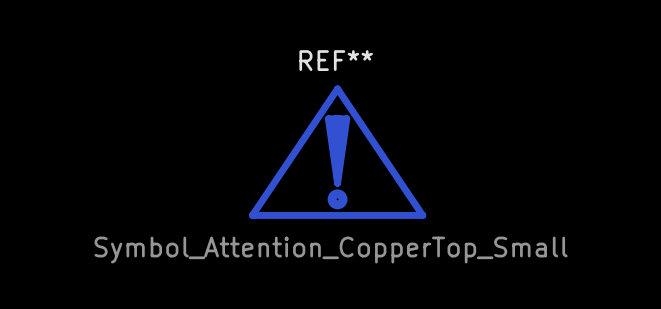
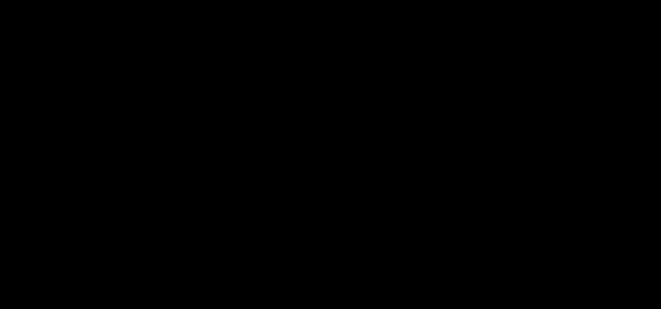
REF**: Symbol_Attention_CopperTop_Small (337, 152) -> none

